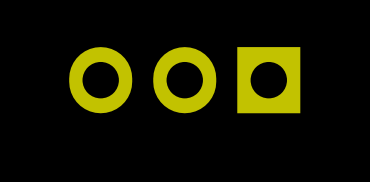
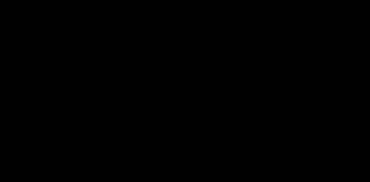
part: (184, 80) -> none

